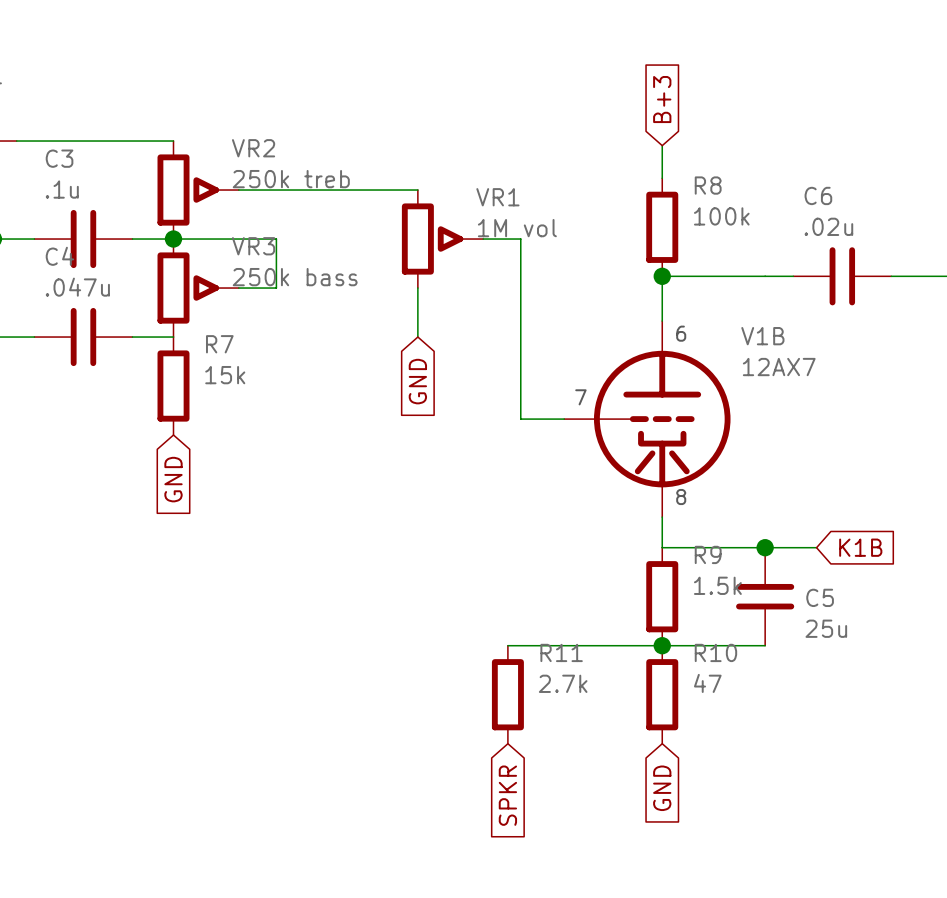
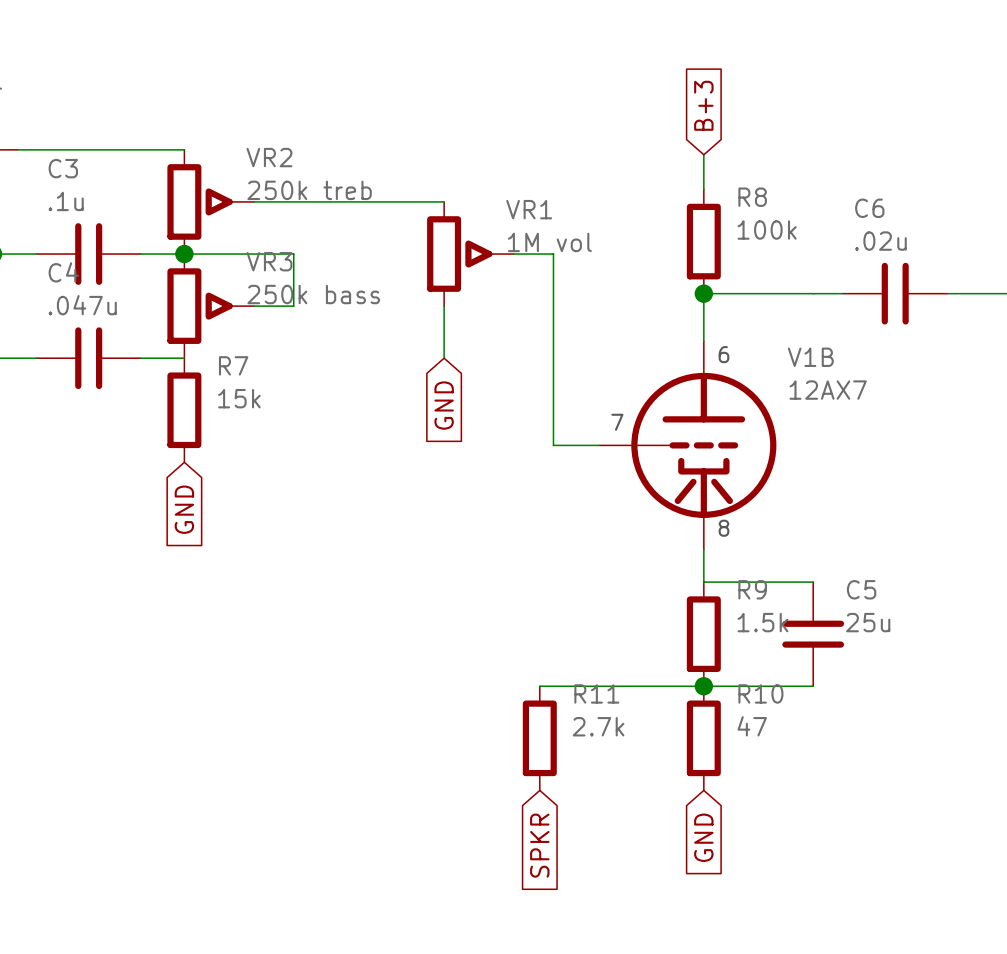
wire: (765, 547) (816, 547) -> none
junction: (765, 547) -> none
global label: K1B (860, 547) -> none
C5 name position: C5 (820, 597) -> C5 (861, 589)
C5 value position: 25u (826, 628) -> 25u (868, 622)

